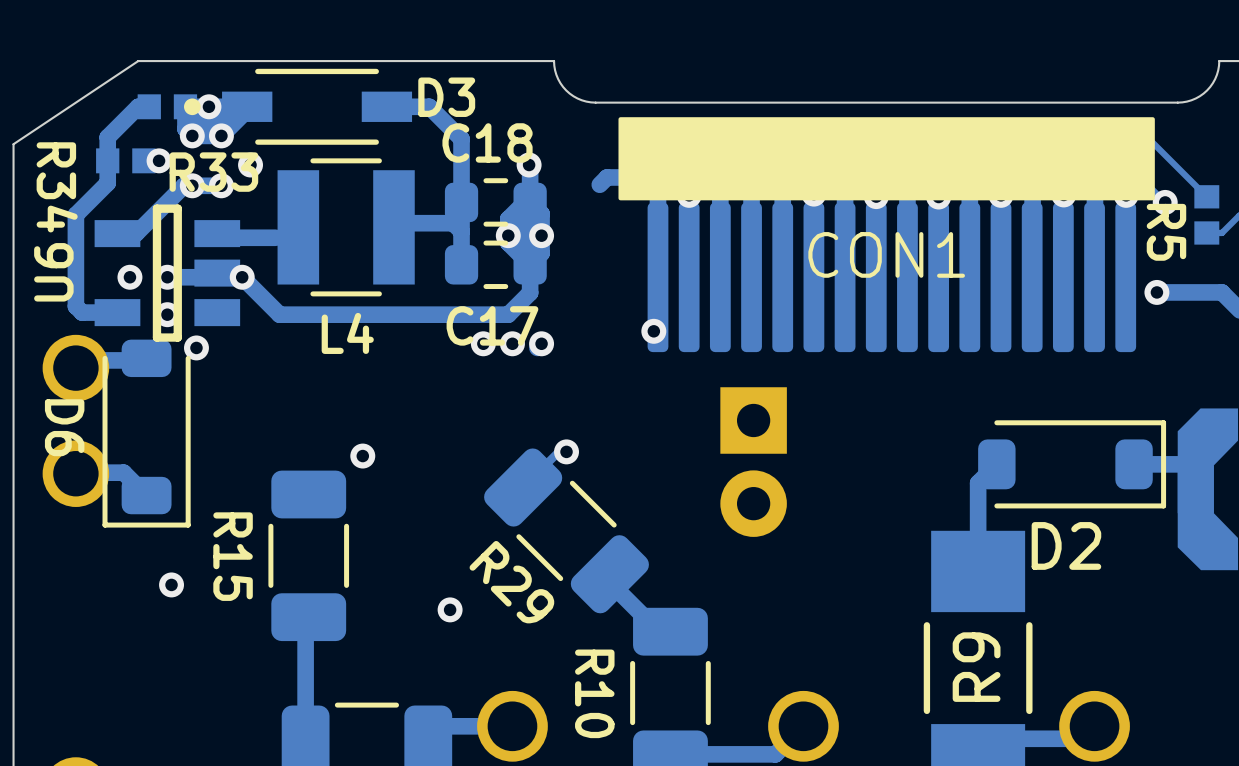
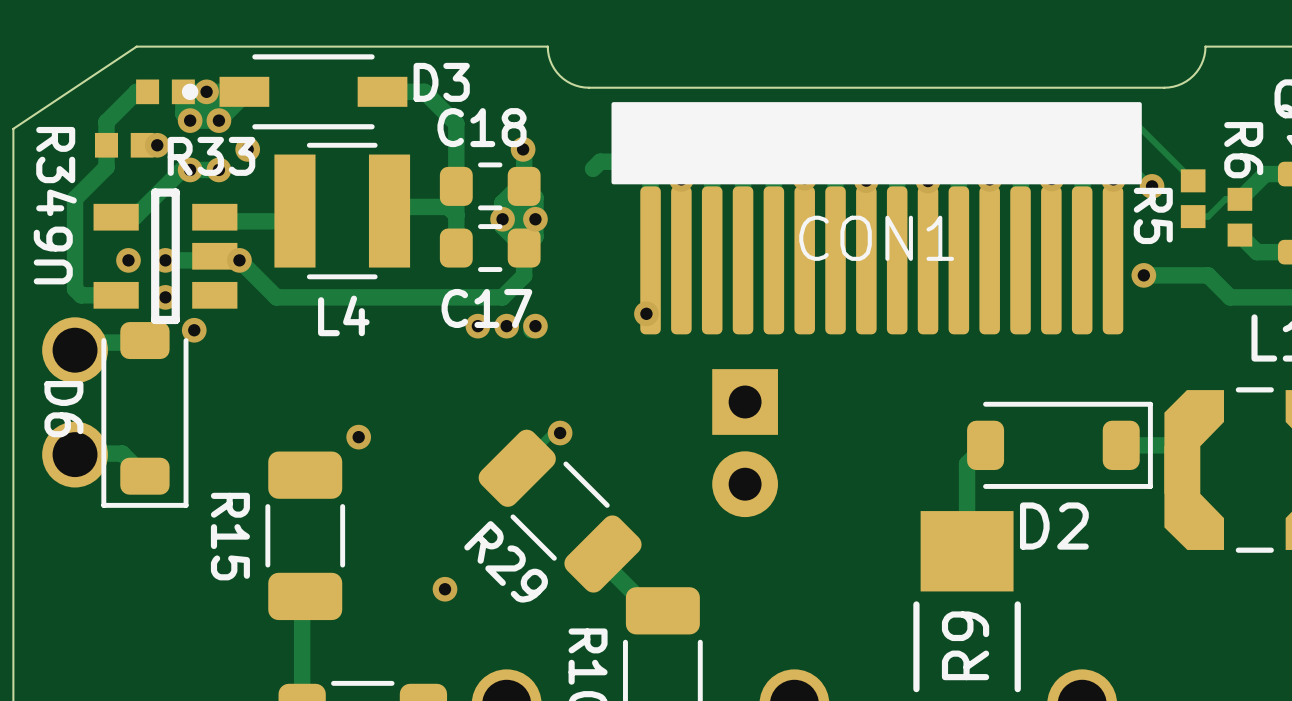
via: (171, 584) -> none

